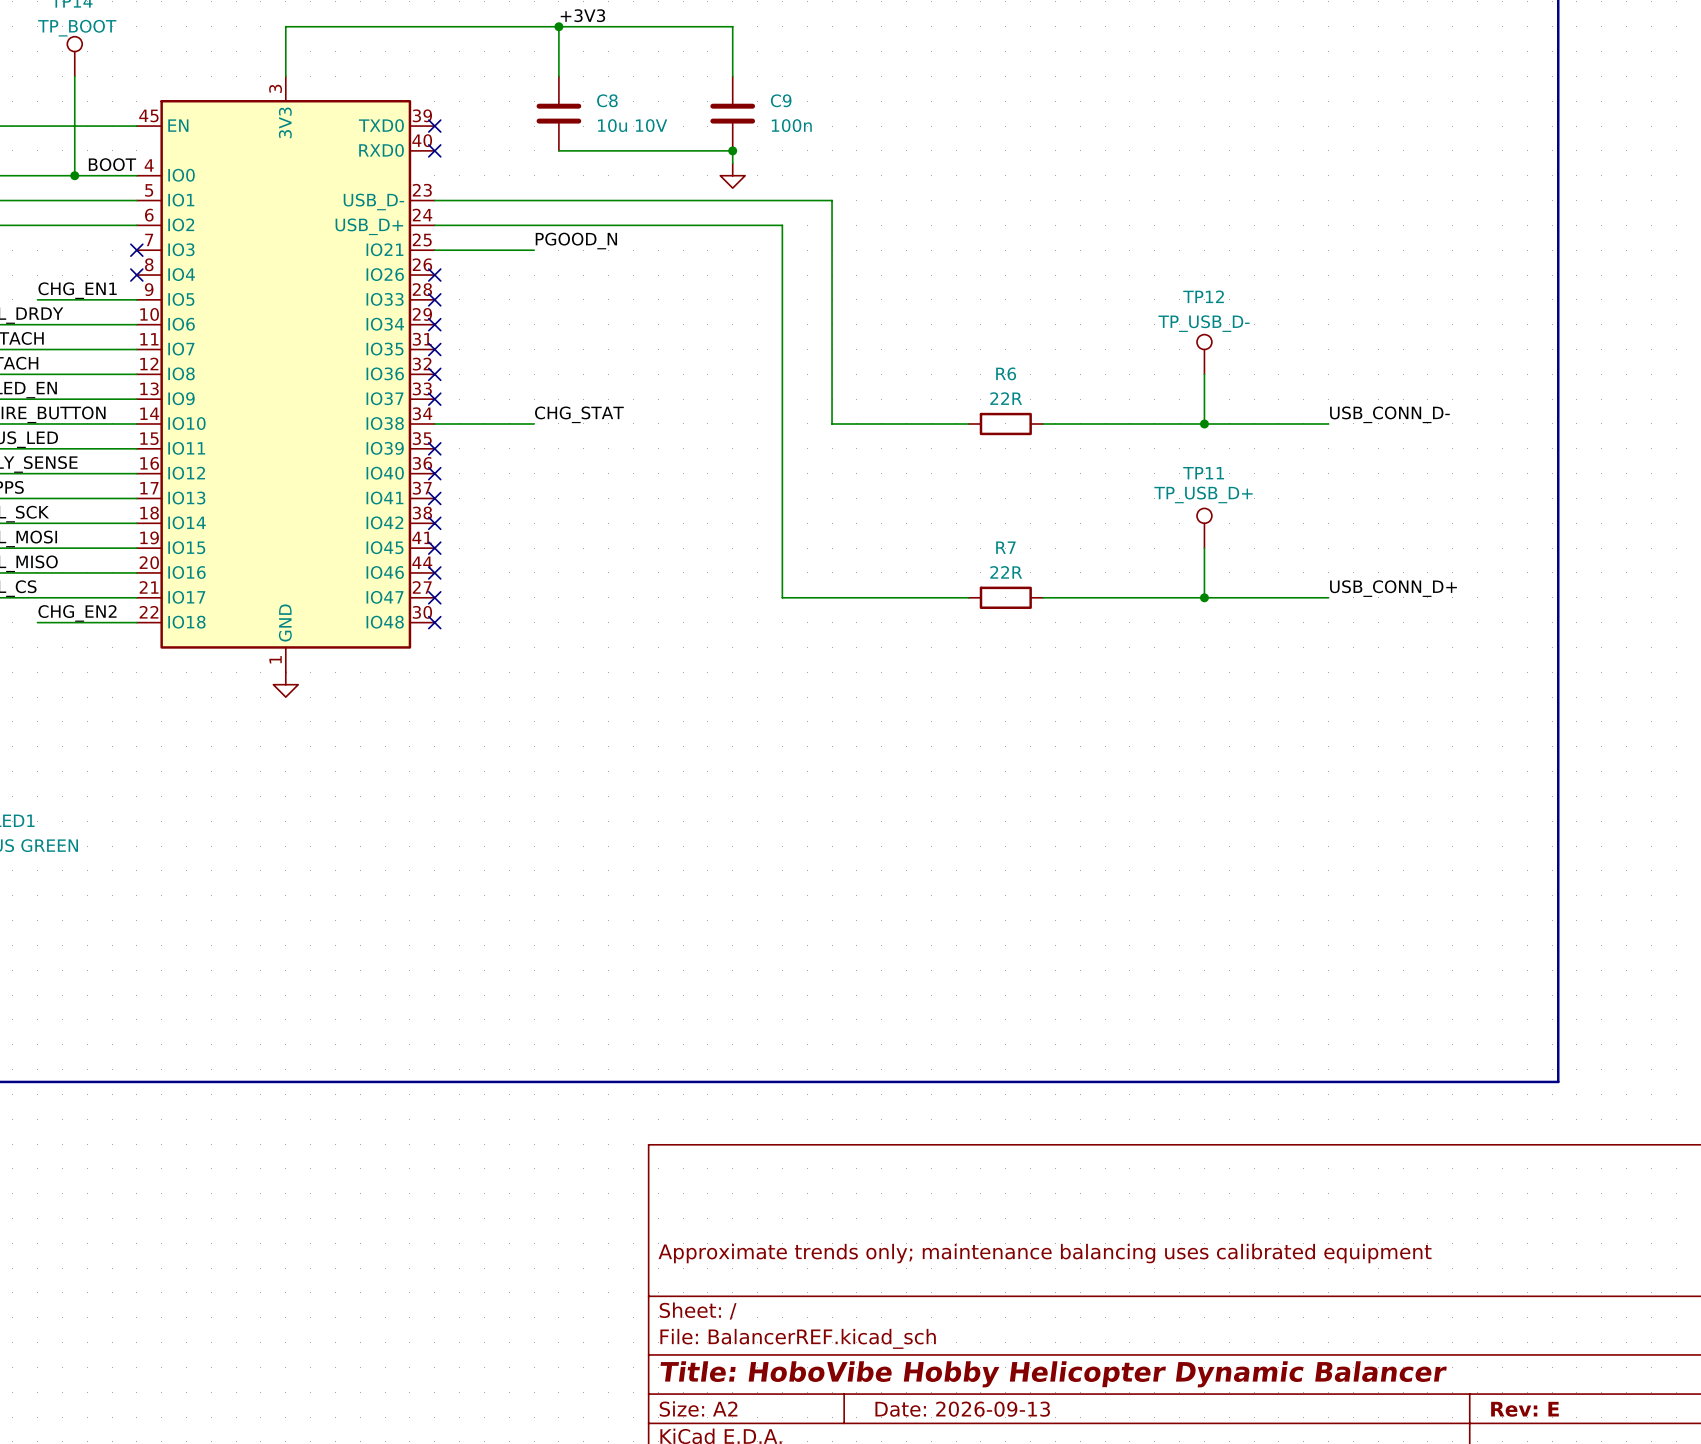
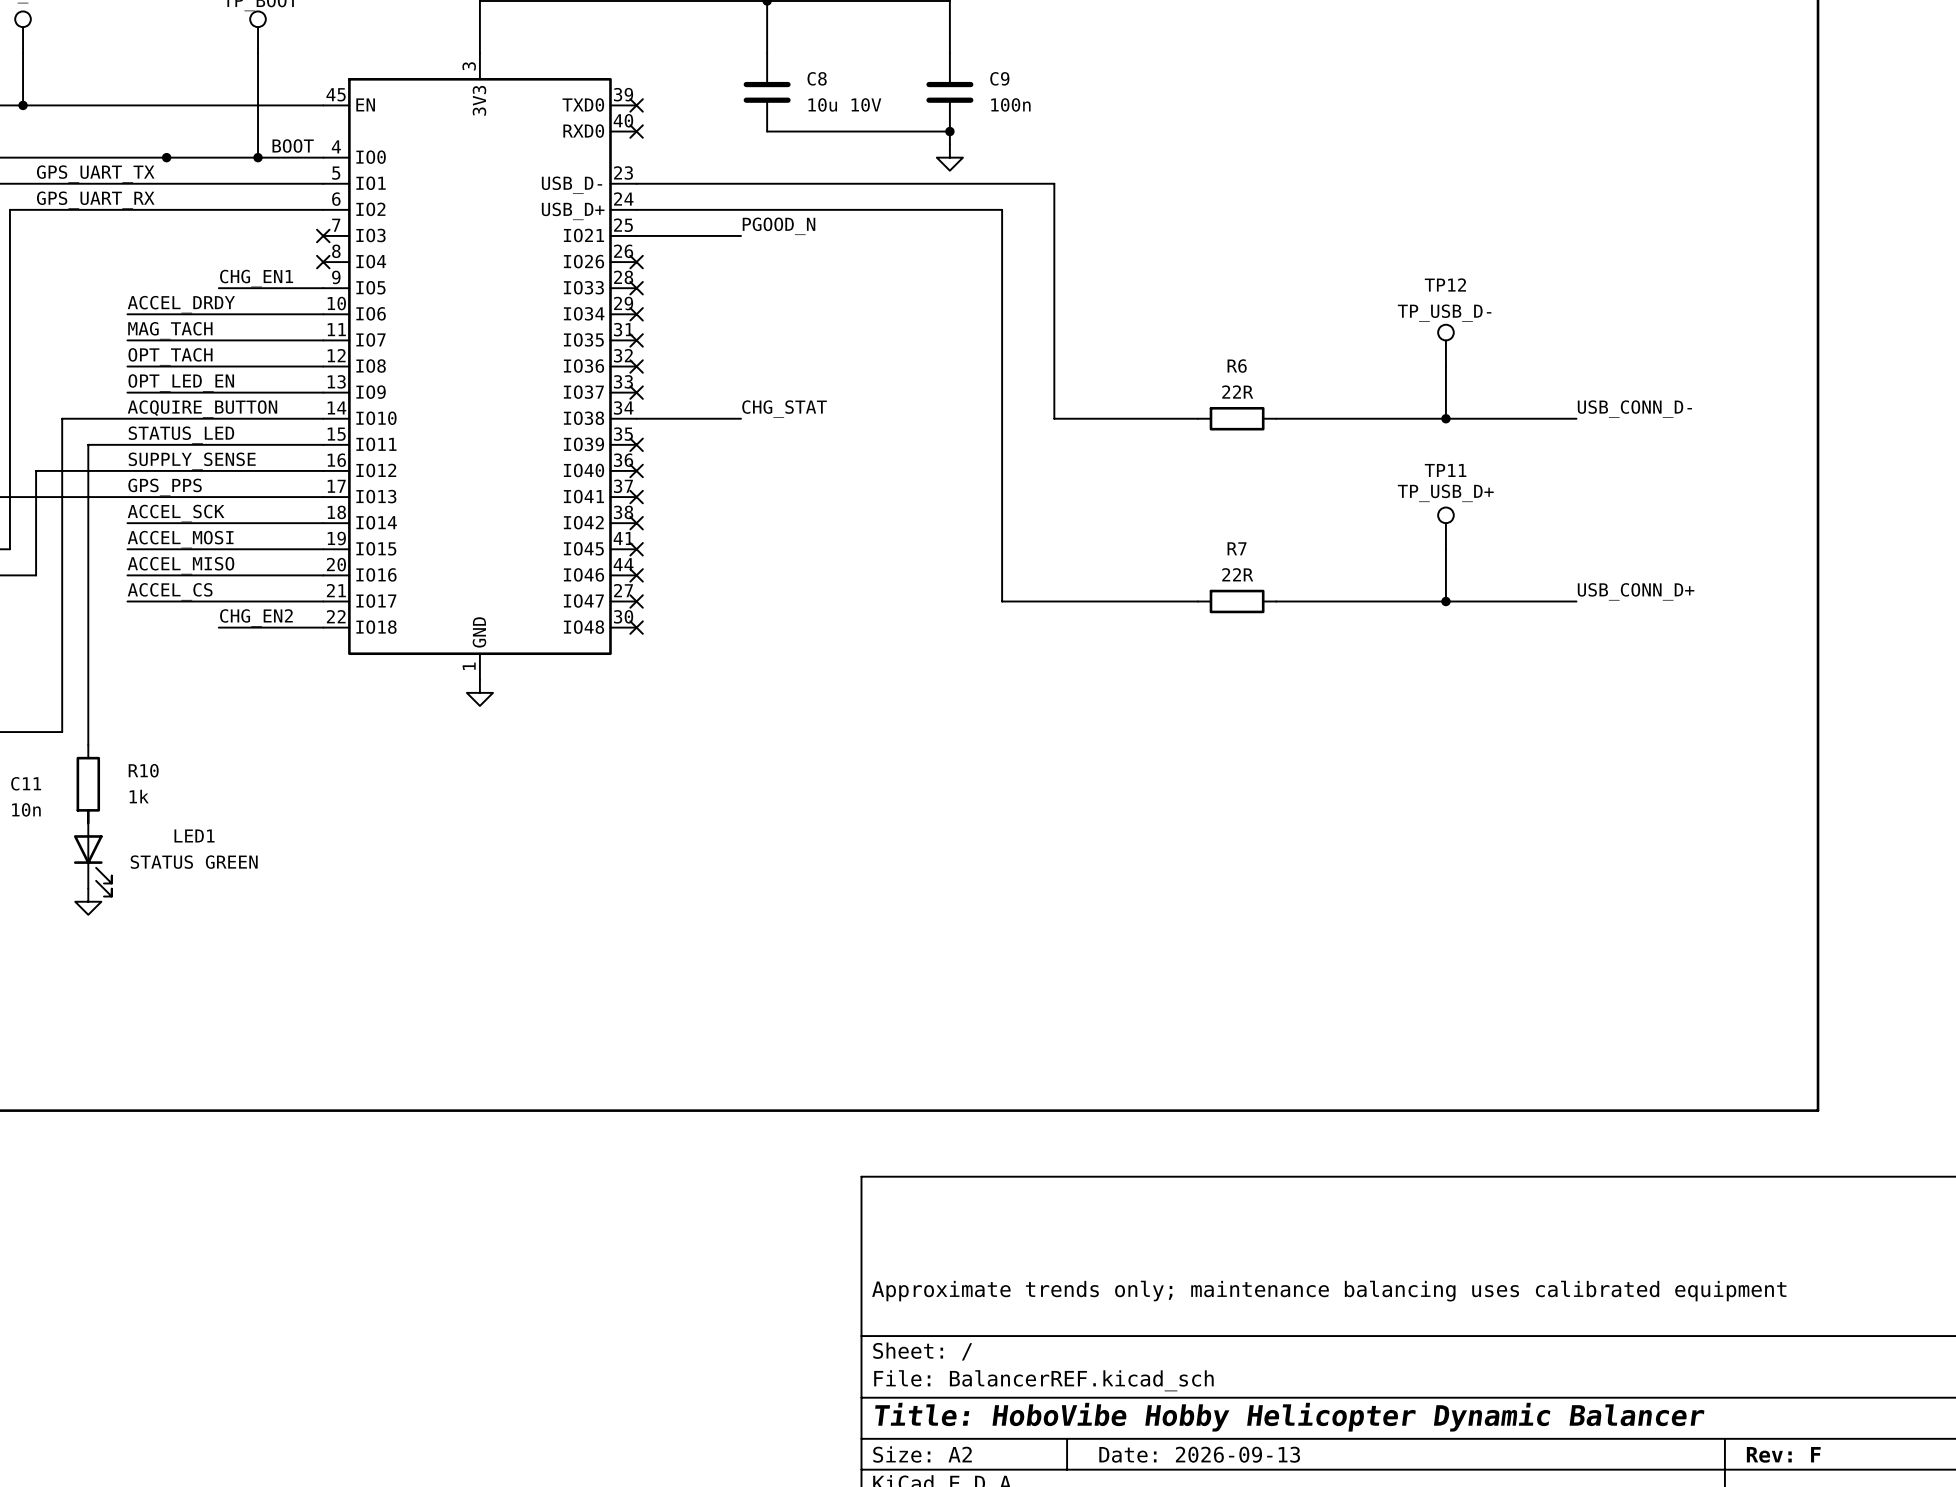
title block: Rev: E (1524, 1409) -> Rev: F (1783, 1454)

